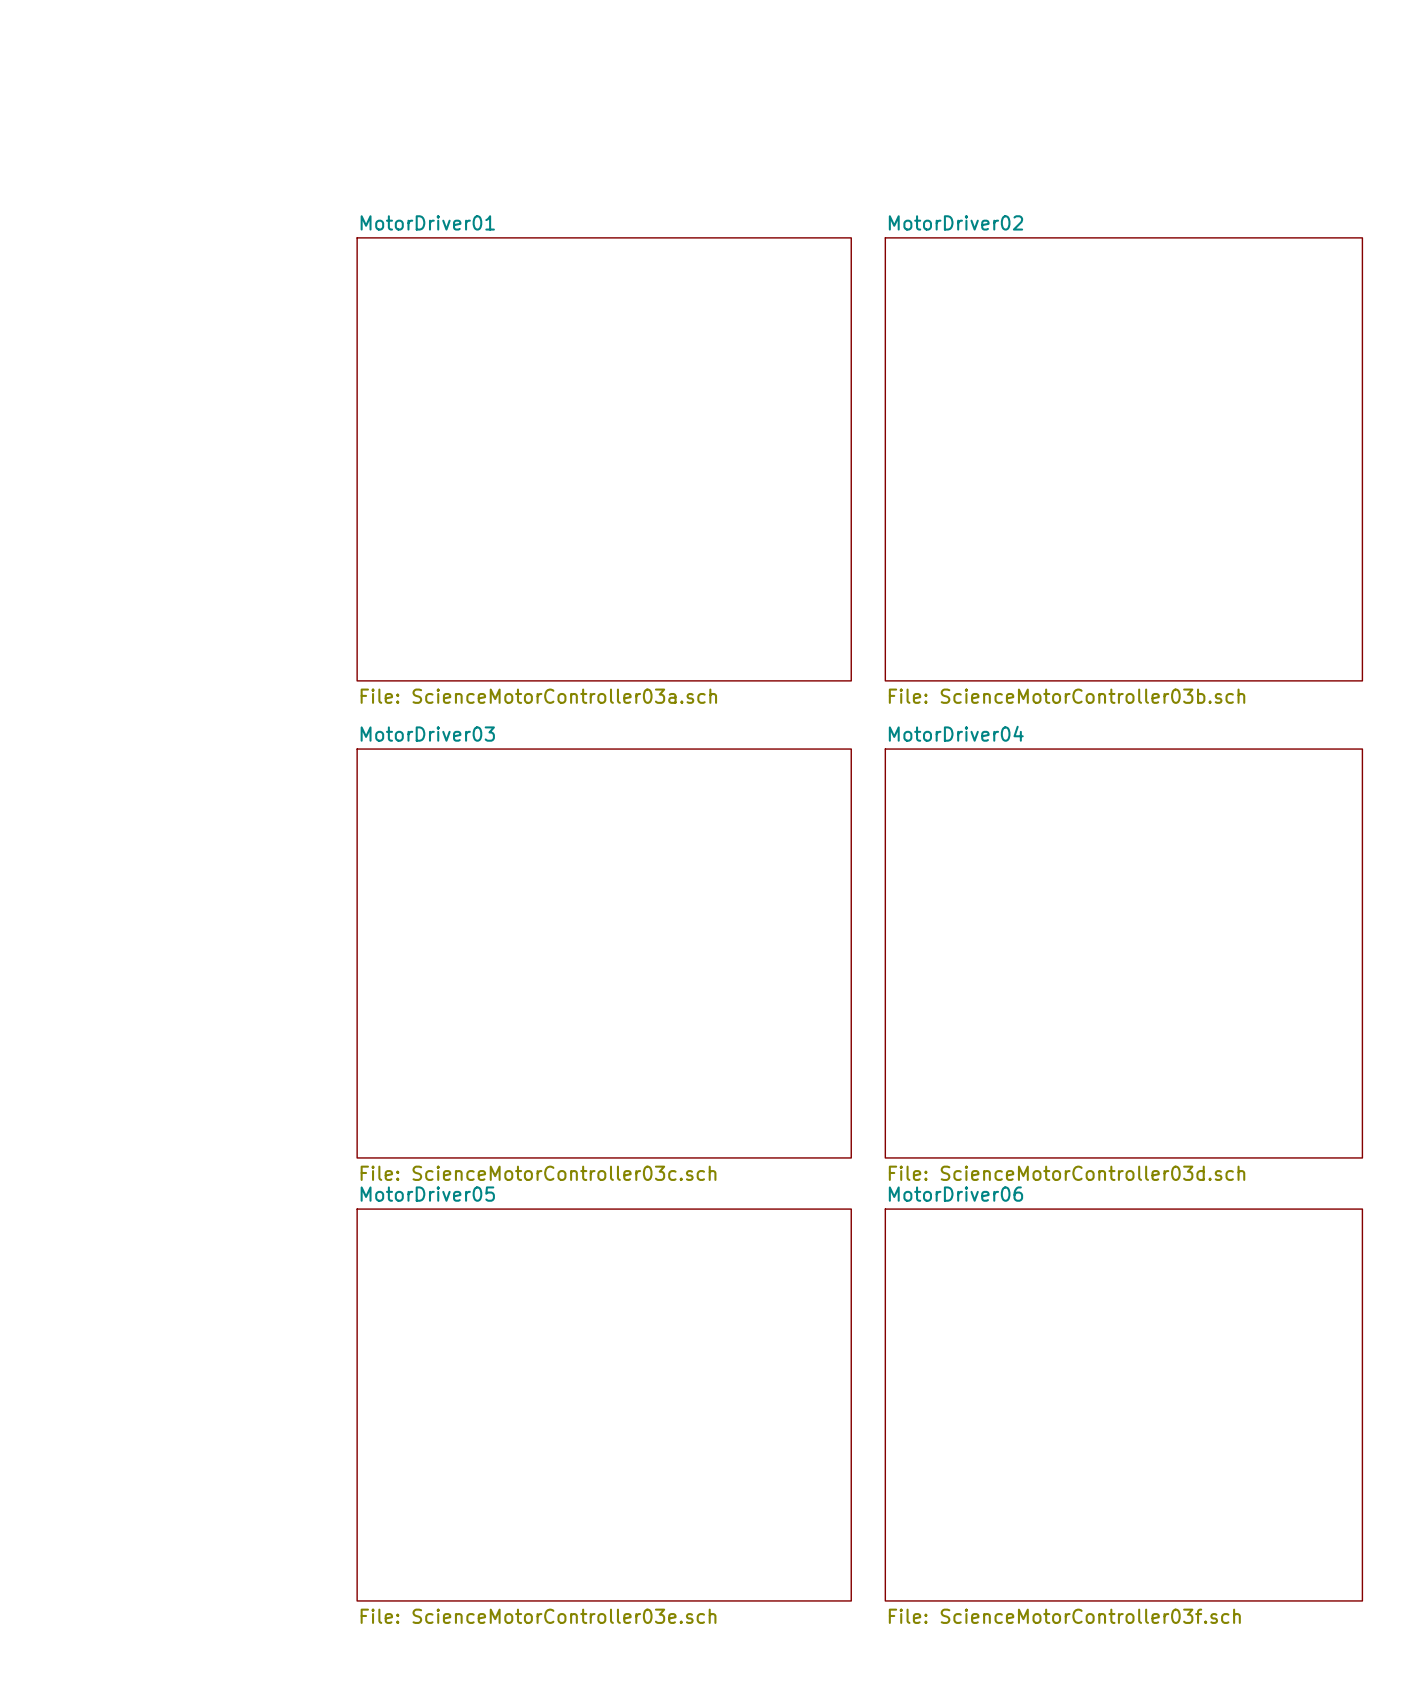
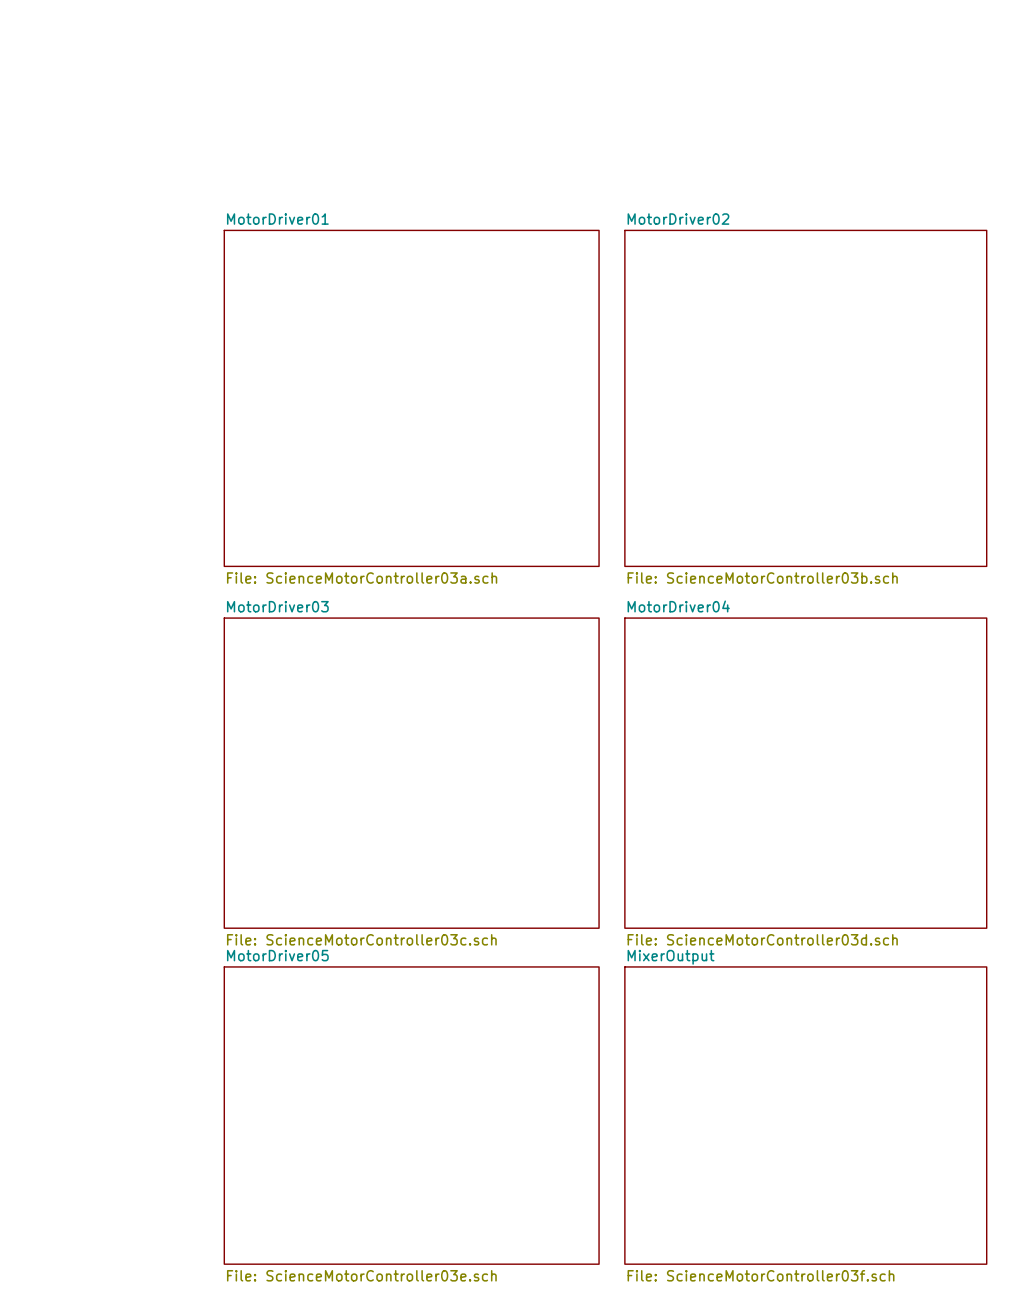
sheet MotorDriver06 name: MotorDriver06 (955, 1194) -> MixerOutput (671, 957)

